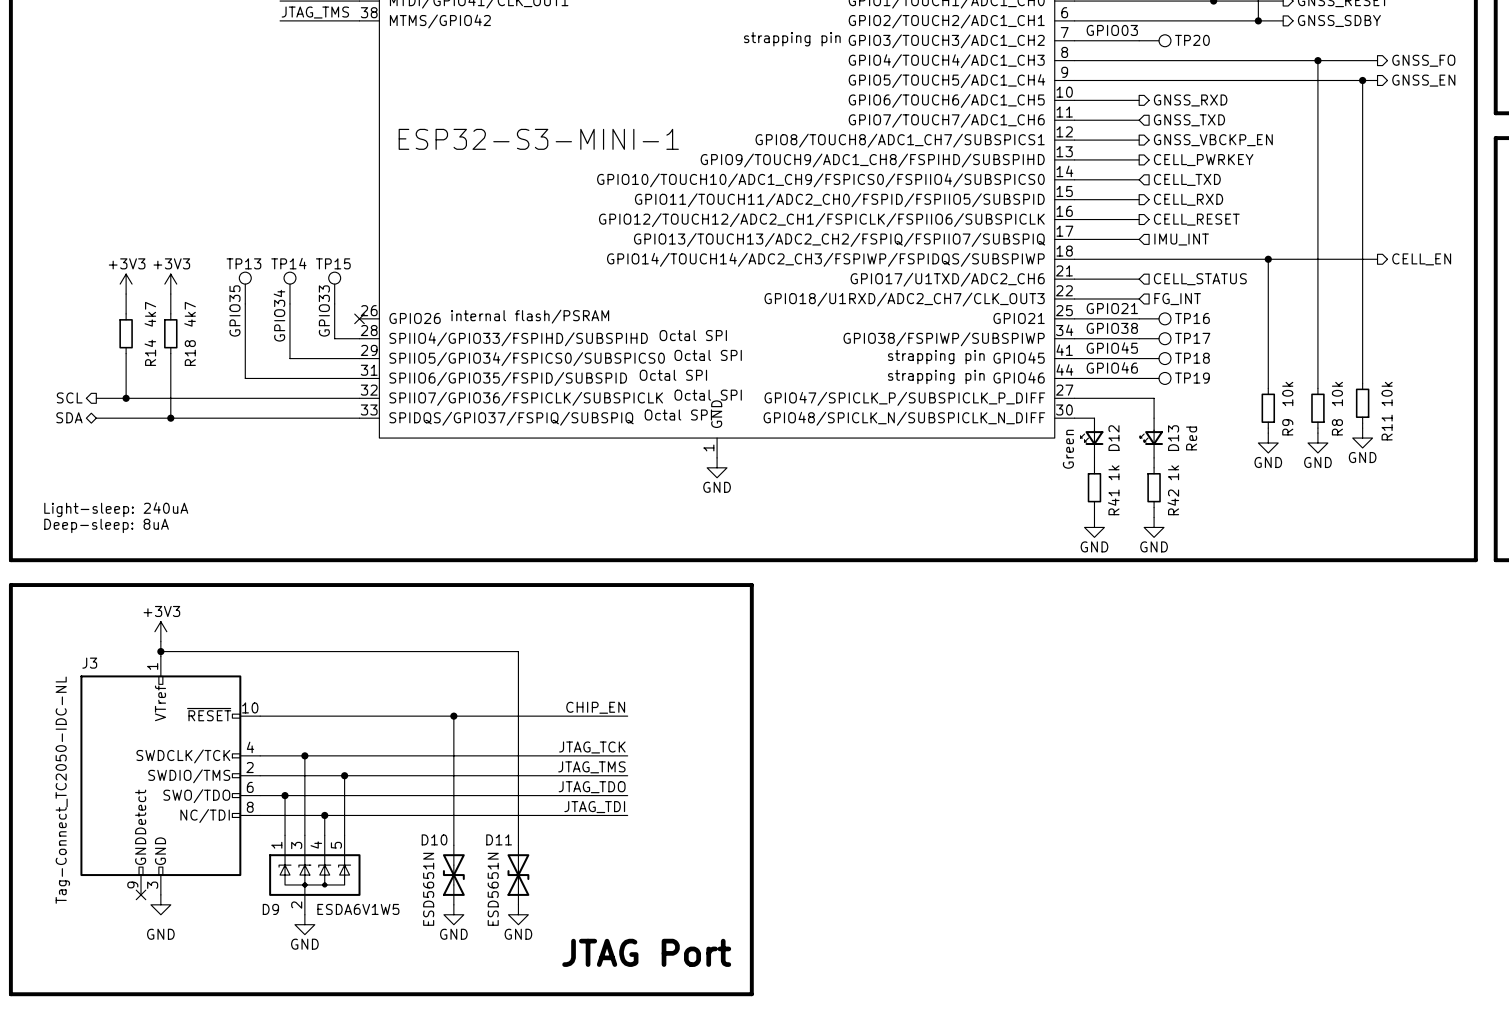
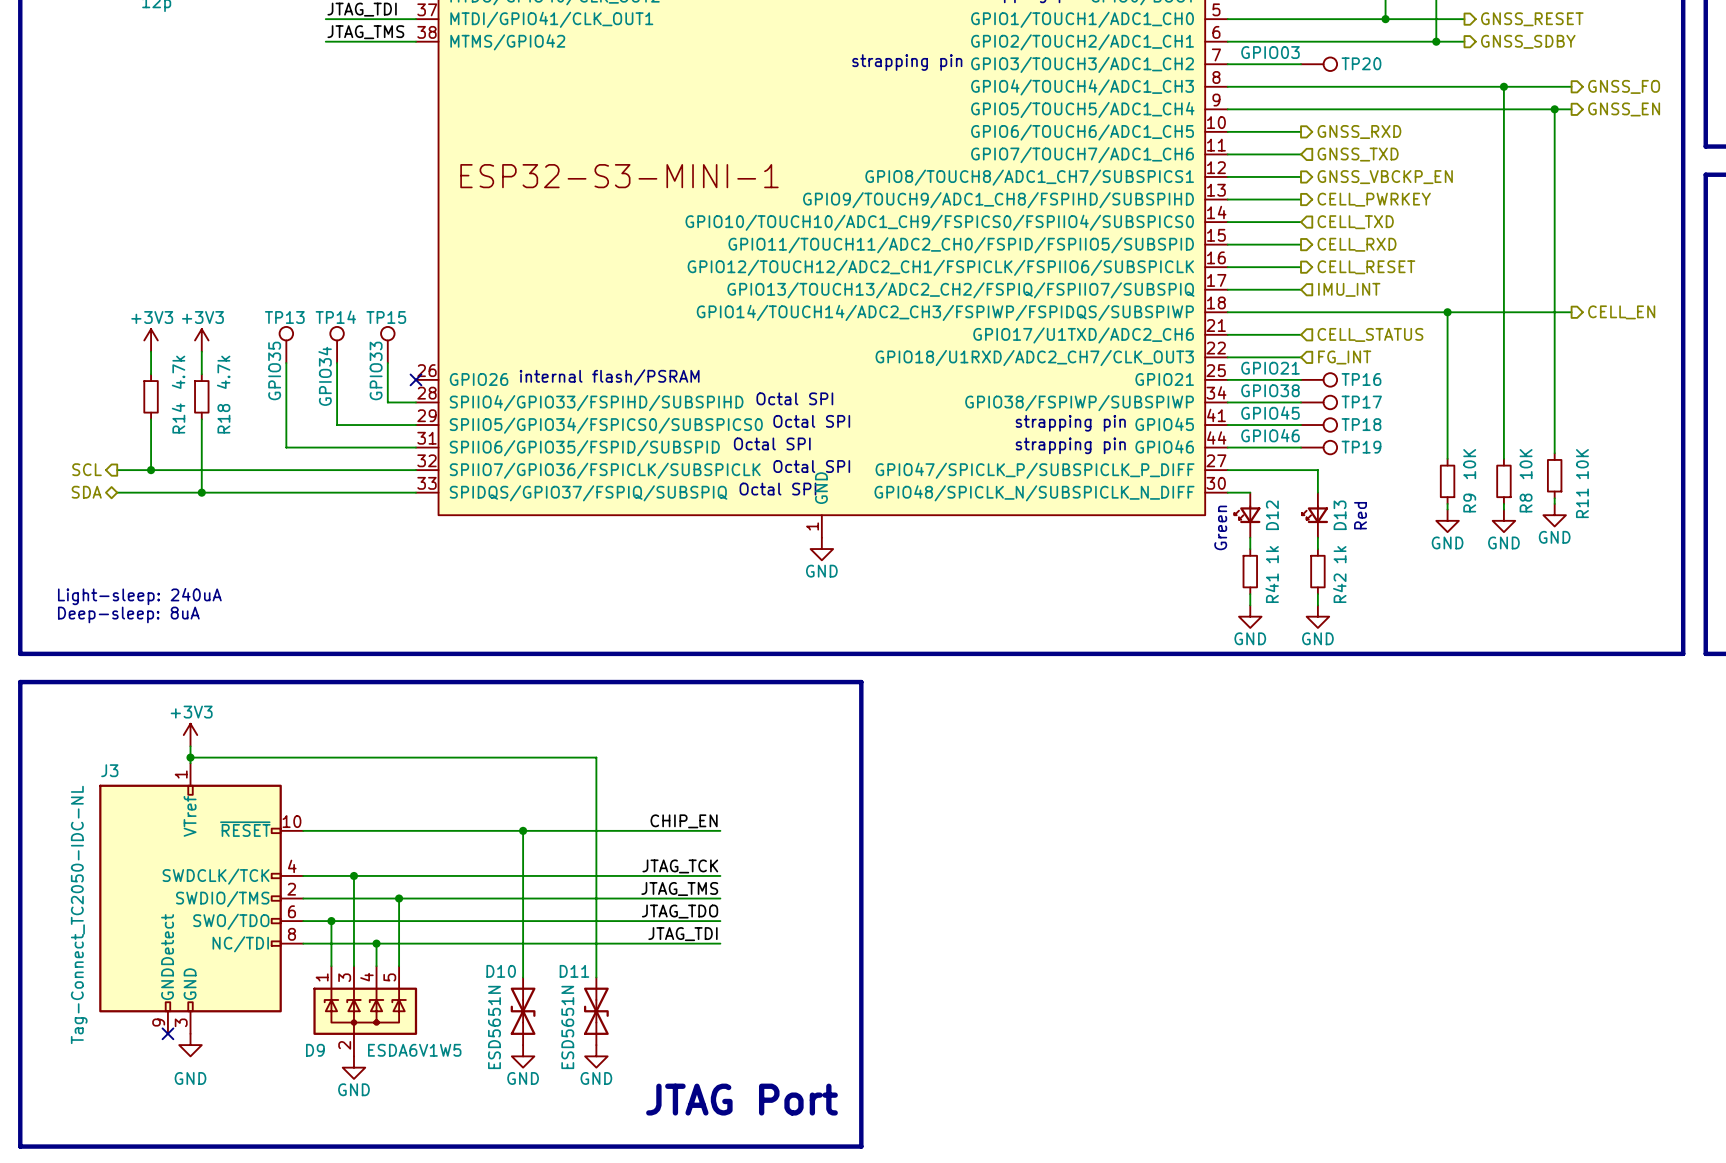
R14 value: 4k7 (150, 314) -> 4.7k (178, 372)
R18 value: 4k7 (190, 314) -> 4.7k (223, 372)
R9 value: 10k (1287, 393) -> 10K (1469, 464)
R8 value: 10k (1337, 393) -> 10K (1526, 464)
R11 value: 10k (1387, 393) -> 10K (1582, 464)

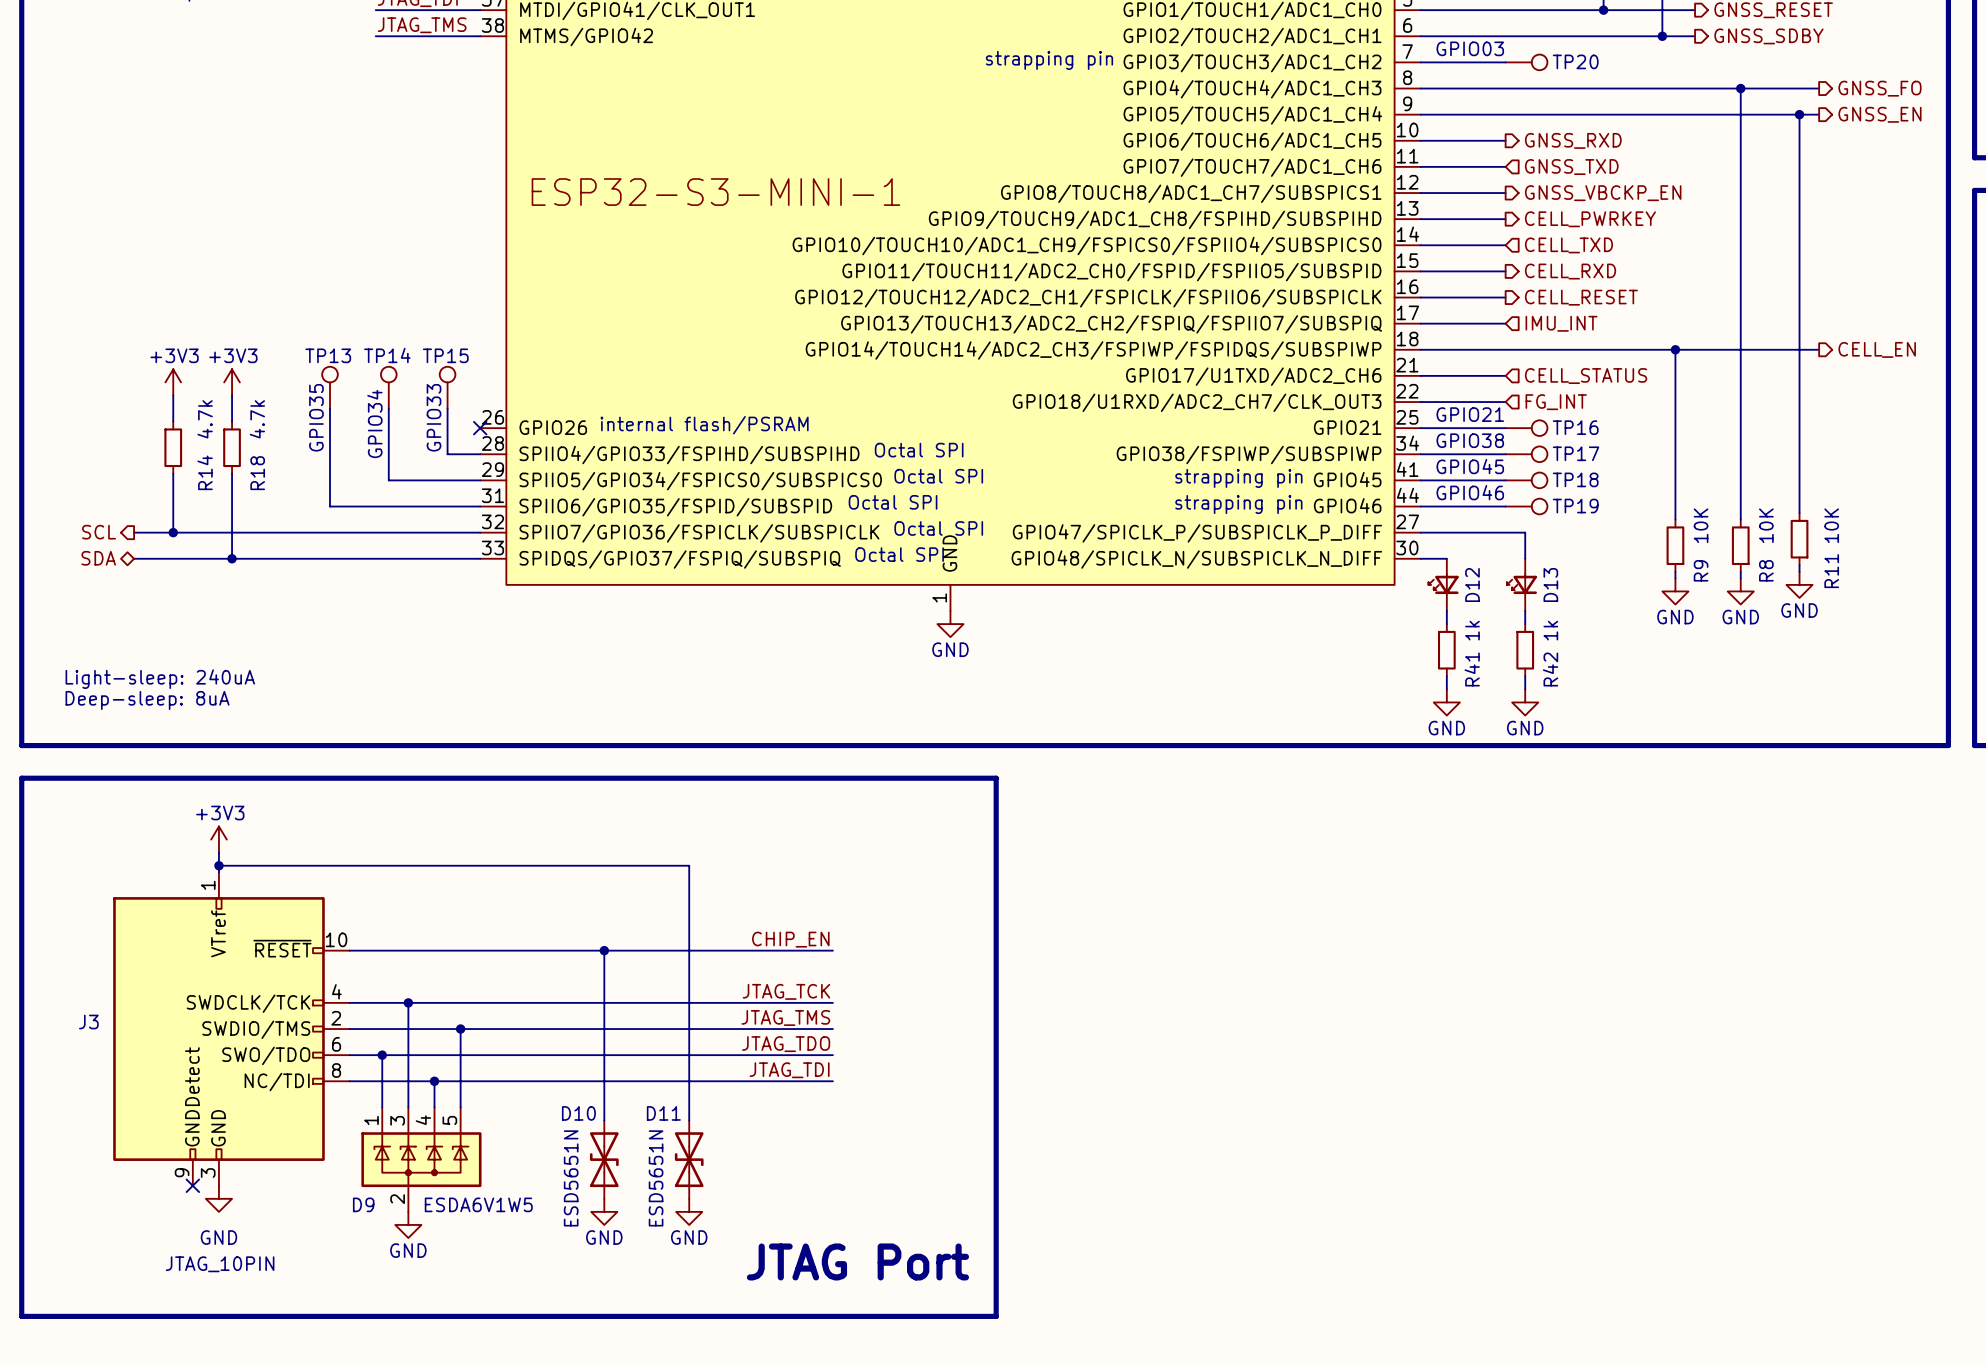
text: Red (1360, 515) -> none
text: Green (1220, 527) -> none
J3 name position: J3 (109, 770) -> J3 (88, 1022)
J3 value: Tag-Connect_TC2050-IDC-NL (79, 914) -> JTAG_10PIN (220, 1264)

